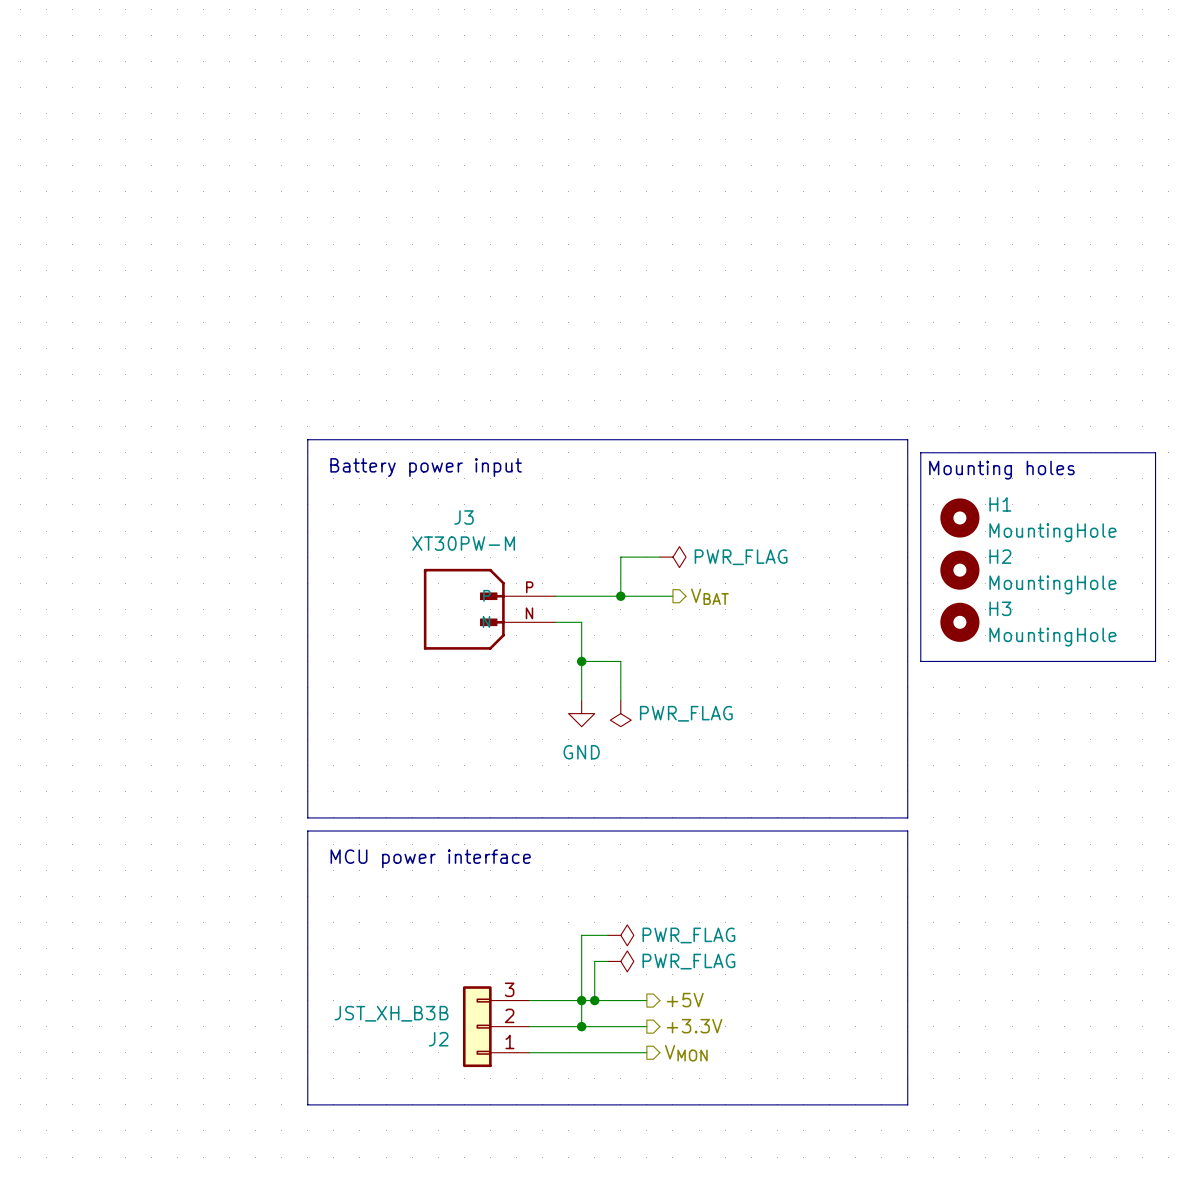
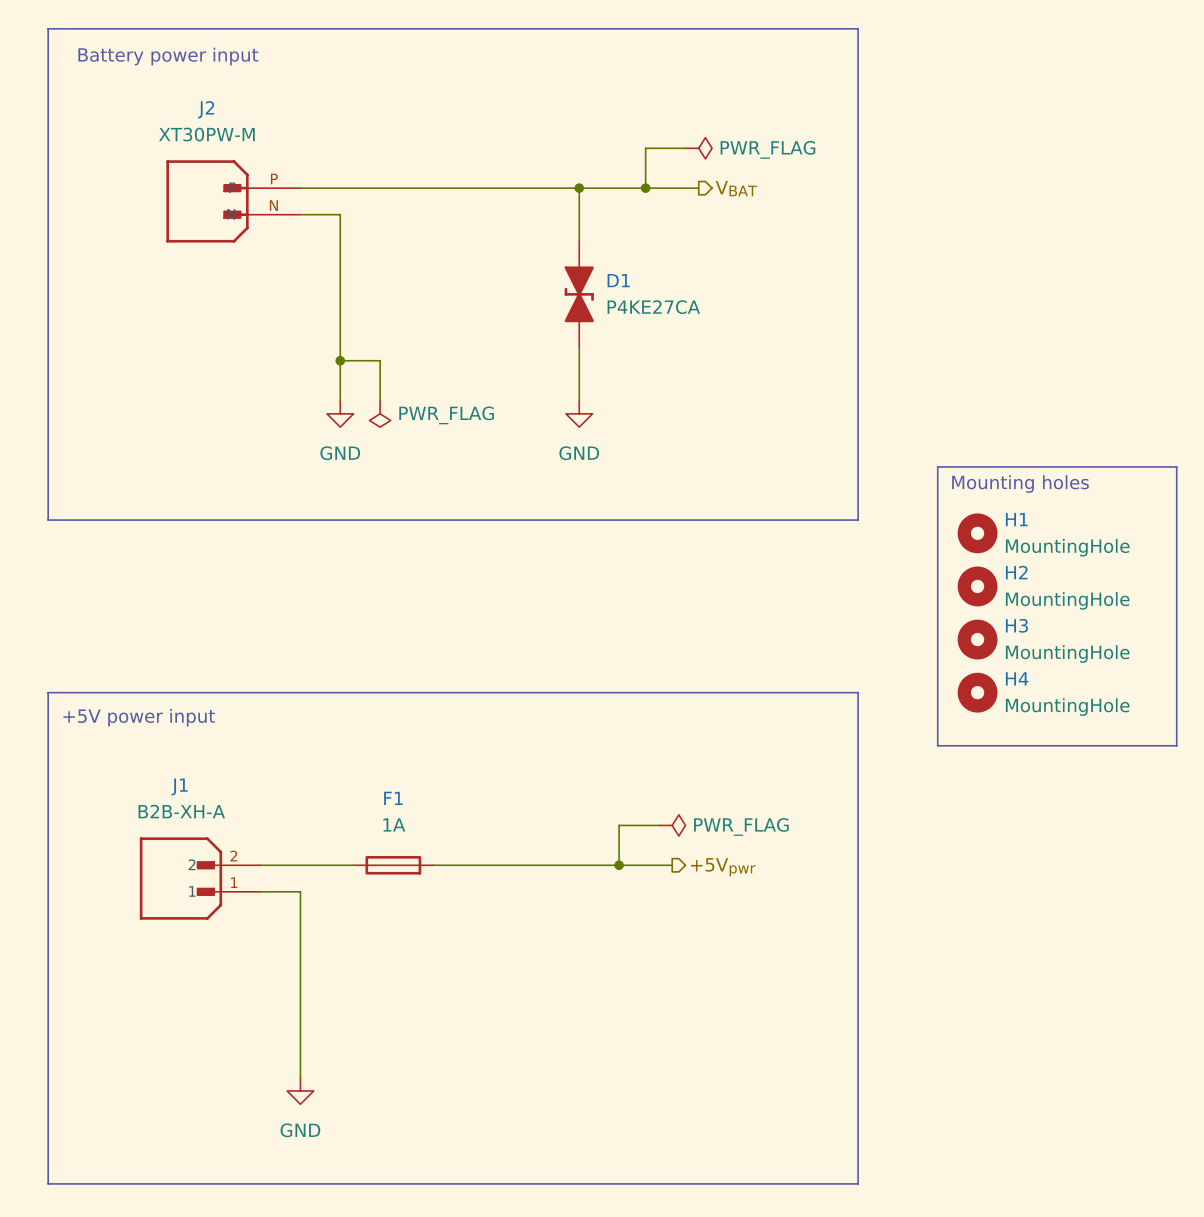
line: none -> (48, 28) (48, 520) (858, 520) (858, 28) (48, 28)
text: none -> Battery power input (168, 56)
wire: none -> (685, 148) (645, 148) (645, 188)
power symbol: none -> PWR_FLAG (698, 148)
wire: none -> (300, 188) (698, 188)
wire: none -> (579, 188) (579, 241)
junction: none -> (579, 188)
junction: none -> (645, 188)
hierarchical label: none -> VBAT (736, 188)
wire: none -> (300, 214) (340, 214) (340, 400)
D1: none -> P4KE27CA (579, 294)
wire: none -> (579, 347) (579, 400)
wire: none -> (340, 360) (380, 360) (380, 400)
junction: none -> (340, 360)
power symbol: none -> GND (340, 413)
power symbol: none -> PWR_FLAG (380, 413)
power symbol: none -> GND (579, 413)
line: (307, 439) (307, 817) (907, 817) (907, 439) (307, 439) -> none
text: Battery power input (426, 467) -> none
wire: (659, 557) (620, 557) (620, 596) -> (658, 825) (619, 825) (619, 865)
power symbol: PWR_FLAG (672, 557) -> none
wire: (555, 596) (672, 596) -> none
junction: (620, 596) -> none
hierarchical label: VBAT (709, 596) -> none
J3: XT30PW-M (489, 609) -> none
wire: (555, 622) (581, 622) (581, 700) -> none
wire: (581, 661) (620, 661) (620, 700) -> none
junction: (581, 661) -> none
line: (920, 661) (1155, 661) -> (937, 679) (937, 745) (1176, 745) (1176, 679)
line: none -> (48, 692) (858, 692) (858, 1183) (48, 1183) (48, 692)
H4: none -> MountingHole (977, 692)
text: none -> +5V power input (139, 717)
power symbol: GND (581, 713) -> none
power symbol: PWR_FLAG (620, 713) -> none
power symbol: none -> PWR_FLAG (672, 825)
line: (307, 831) (907, 831) (907, 1104) (307, 1104) (307, 831) -> none
wire: none -> (260, 865) (353, 865)
F1: none -> 1A (393, 865)
wire: none -> (433, 865) (672, 865)
junction: none -> (619, 865)
hierarchical label: none -> +5Vpwr (723, 867)
J1: none -> B2B-XH-A (200, 878)
text: MCU power interface (430, 858) -> none
wire: none -> (260, 891) (300, 891) (300, 1077)
wire: (607, 935) (581, 935) (581, 1026) -> none
power symbol: PWR_FLAG (620, 935) -> none
wire: (607, 961) (594, 961) (594, 1000) -> none
power symbol: PWR_FLAG (620, 961) -> none
J2 symbol: [462, 986, 530, 1068] -> [166, 160, 301, 243]
wire: (529, 1000) (646, 1000) -> none
junction: (581, 1000) -> none
junction: (594, 1000) -> none
hierarchical label: +5V (685, 1000) -> none
J2 value: JST_XH_B3B (391, 1013) -> XT30PW-M (206, 134)
wire: (529, 1026) (646, 1026) -> none
junction: (581, 1026) -> none
hierarchical label: +3.3V (694, 1026) -> none
J2 name position: J2 (438, 1039) -> J2 (206, 109)
wire: (529, 1052) (646, 1052) -> none
hierarchical label: VMON (686, 1053) -> none
power symbol: none -> GND (300, 1090)

